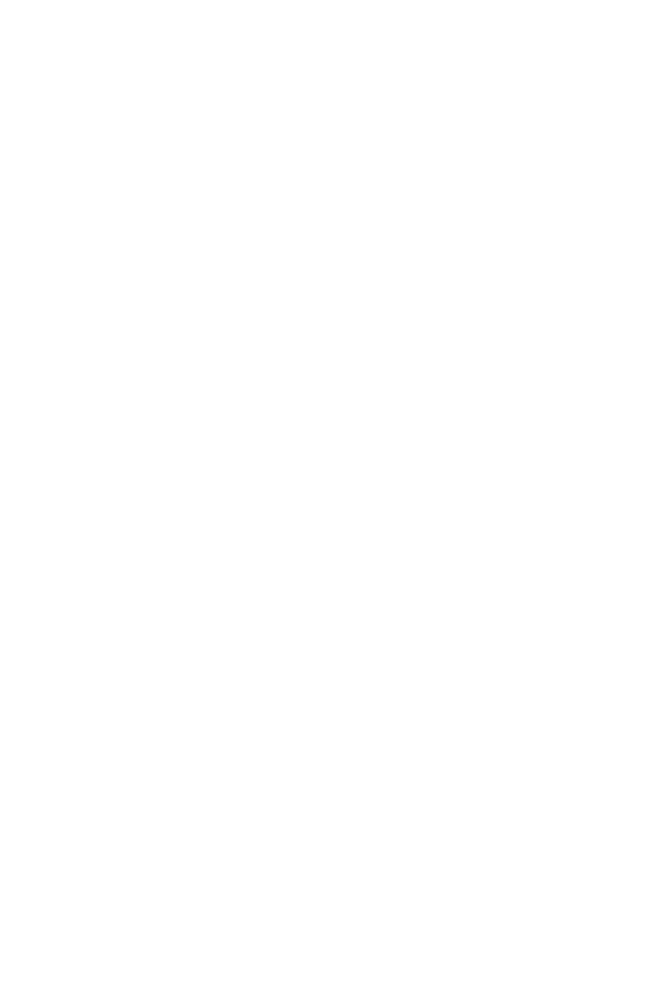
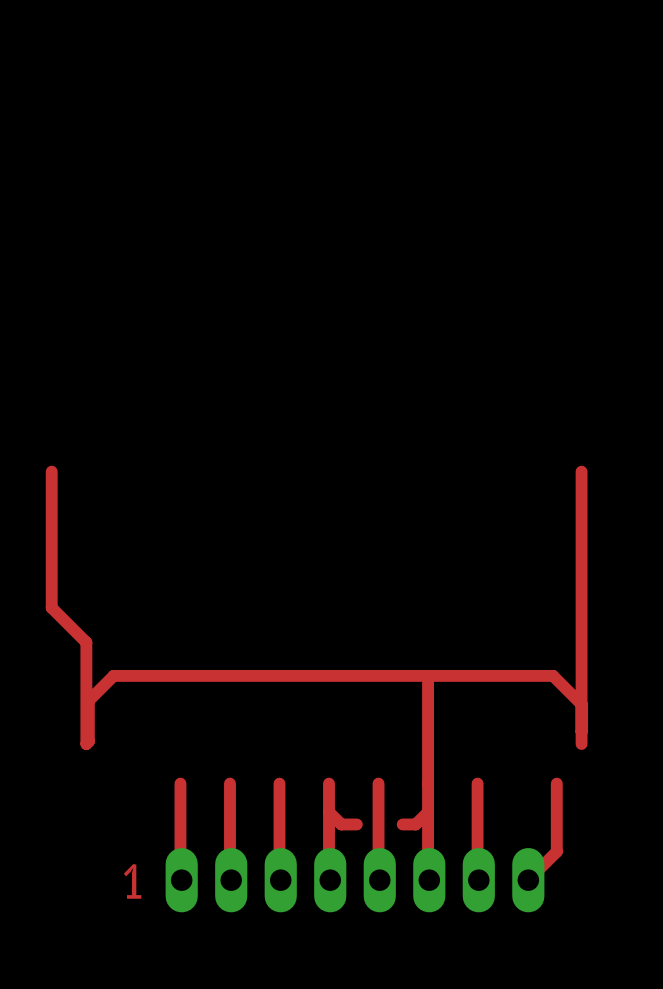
top track: none -> (51, 471) (51, 607) (86, 642) (86, 744) (88, 741) (88, 700) (113, 675) (553, 675) (581, 704)
top track: none -> (581, 471) (581, 744)
top track: none -> (429, 675) (429, 880)
top track: none -> (180, 783) (181, 880)
top track: none -> (229, 783) (231, 880)
top track: none -> (279, 783) (280, 880)
top track: none -> (329, 783) (330, 880)
top track: none -> (378, 783) (379, 880)
top track: none -> (477, 783) (478, 880)
top track: none -> (556, 783) (556, 851) (528, 880)
top track: none -> (329, 812) (341, 824) (356, 824)
top track: none -> (428, 812) (415, 824) (402, 824)
part: none -> (355, 880)
text: none -> 1 (132, 881)

